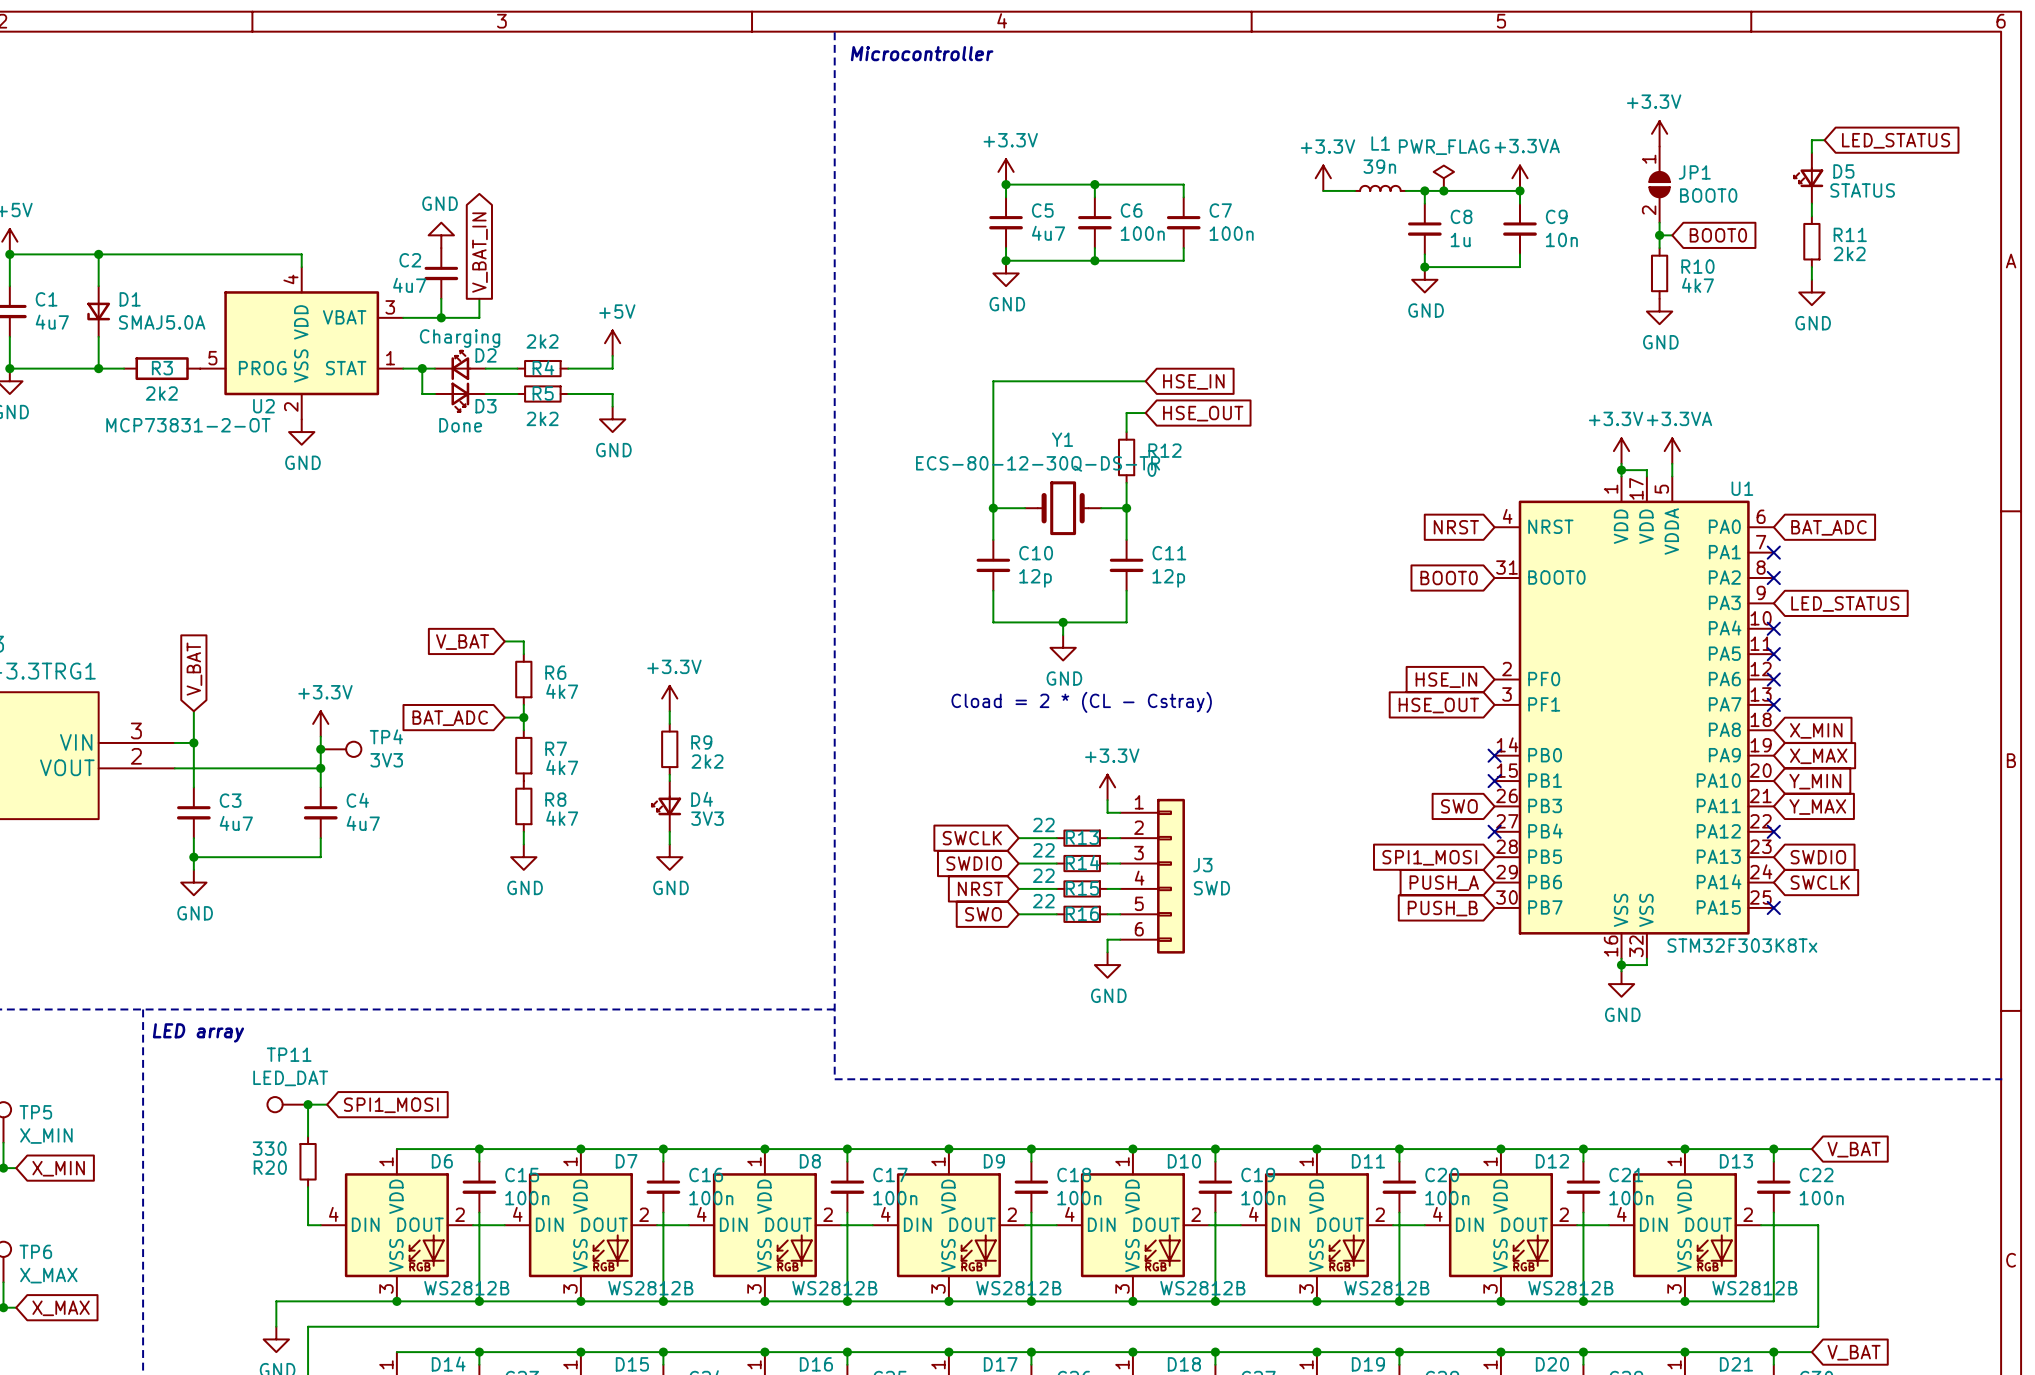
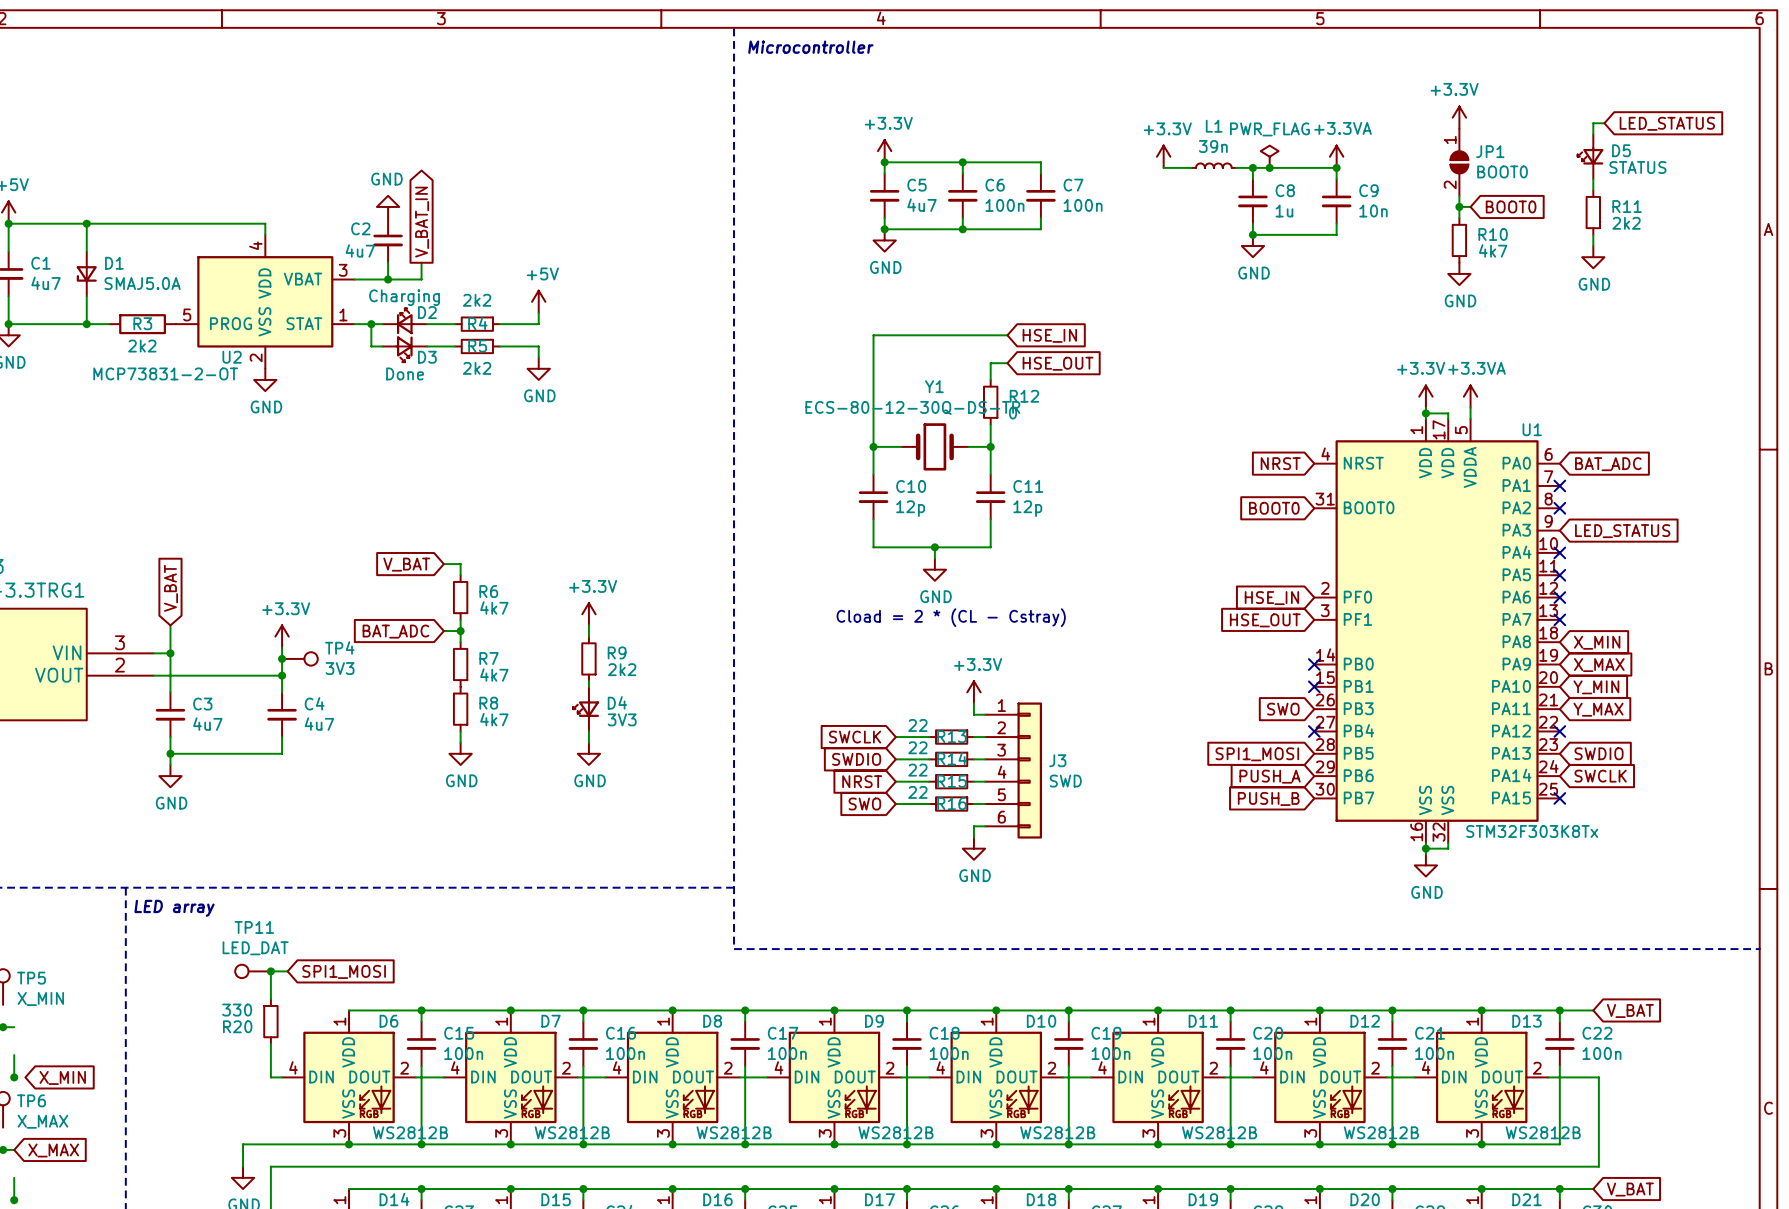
wire: (3, 1142) (3, 1168) -> (14, 1055) (14, 1077)
global label position: X_MIN (58, 1168) -> X_MIN (62, 1077)
junction: none -> (14, 1077)
wire: (3, 1282) (3, 1307) -> (14, 1177) (14, 1200)
junction: none -> (14, 1200)

